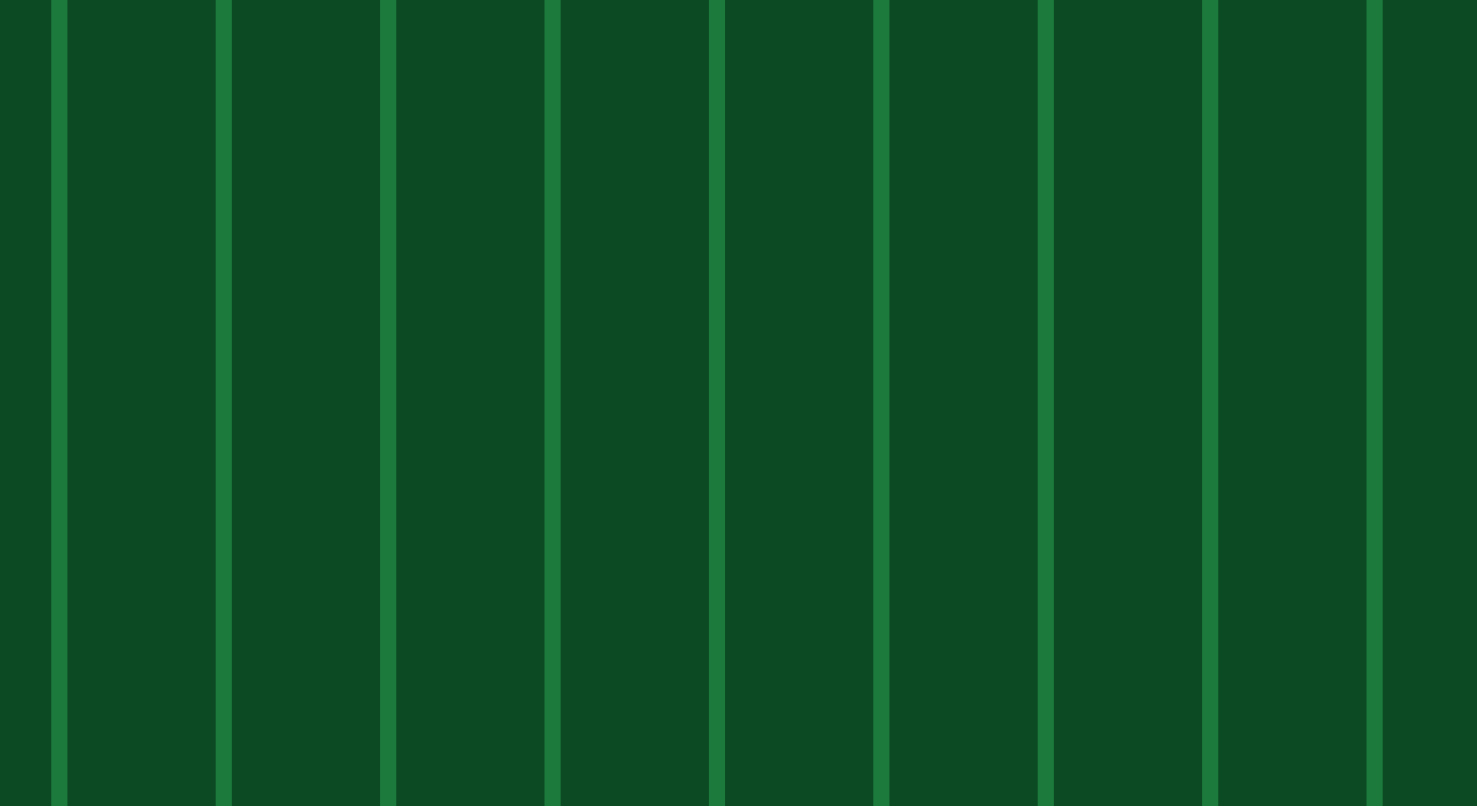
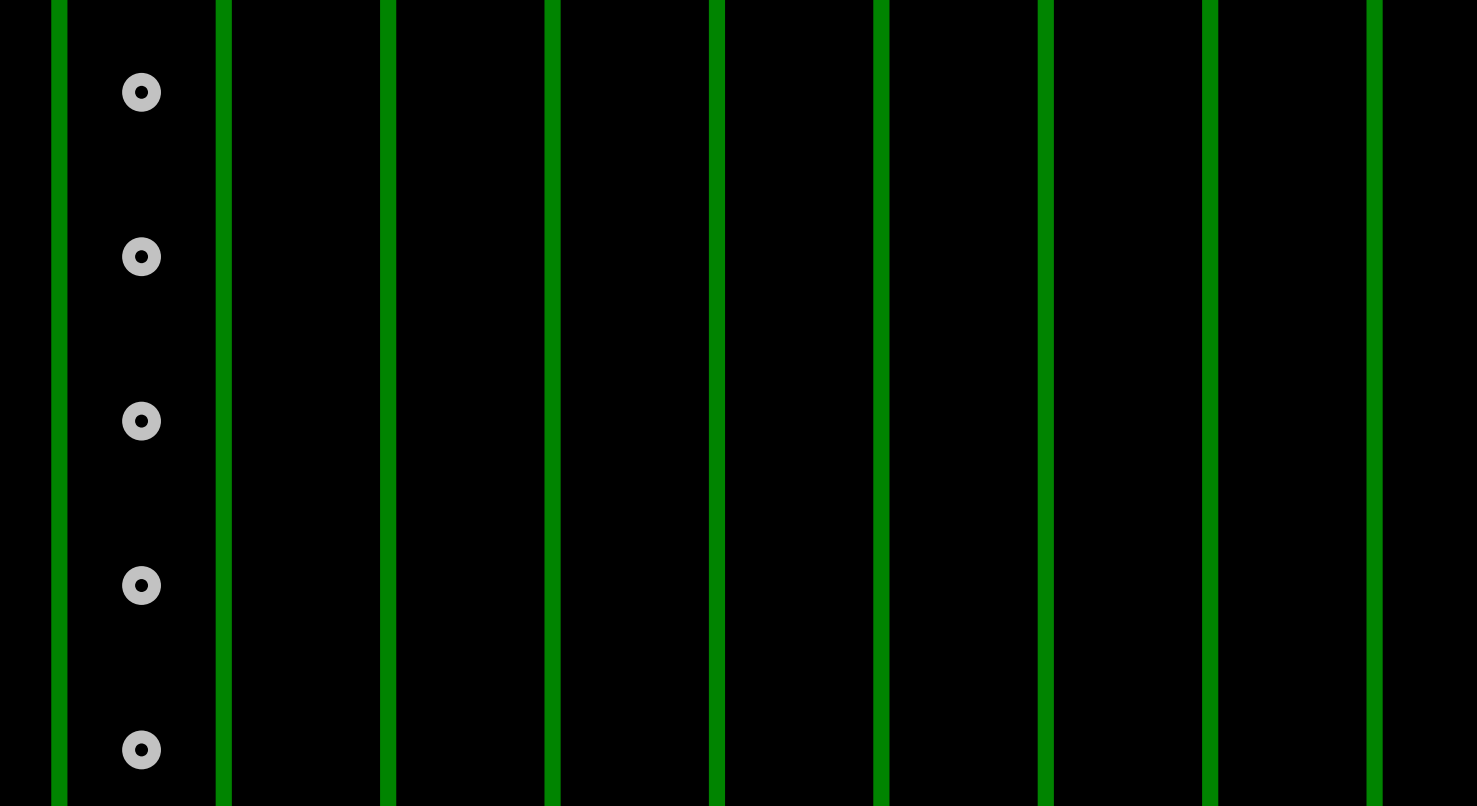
via: none -> (141, 92)
via: none -> (141, 256)
via: none -> (141, 421)
via: none -> (141, 585)
via: none -> (141, 749)

